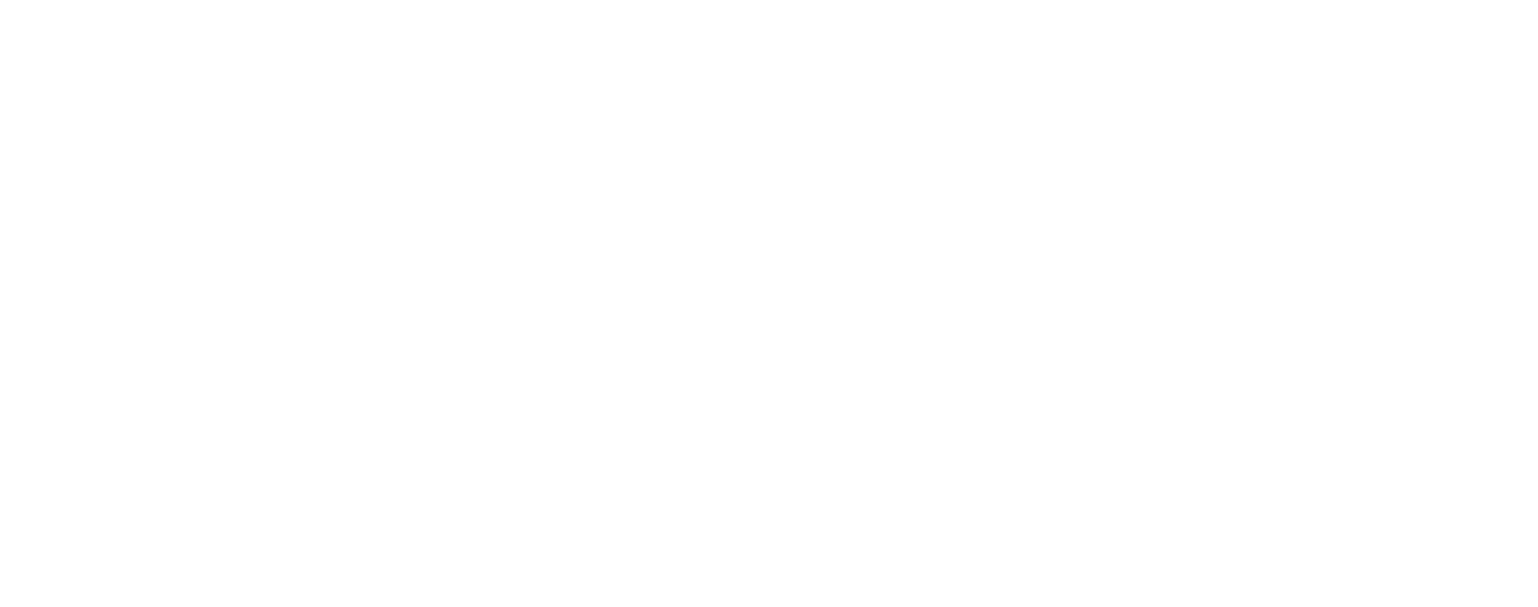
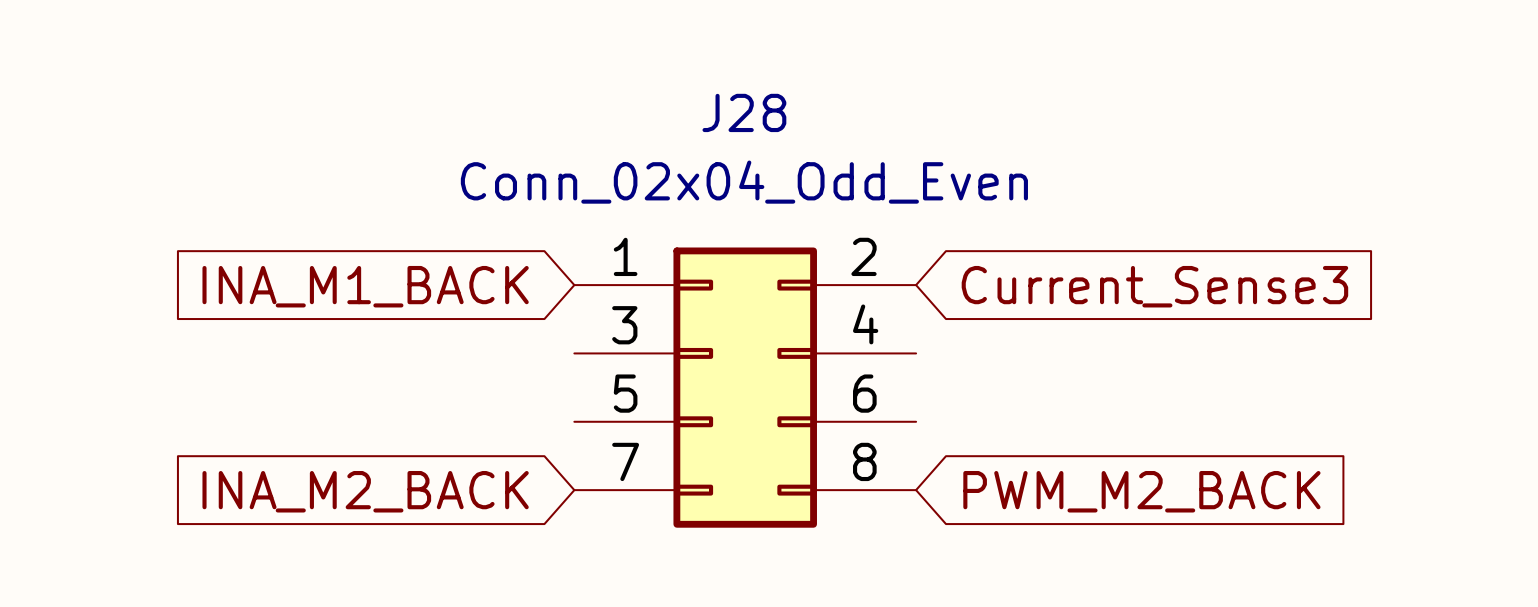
global label: none -> INA_M1_BACK (365, 286)
global label: none -> Current_Sense3 (1154, 286)
J28: none -> Conn_02x04_Odd_Even (745, 387)
global label: none -> INA_M2_BACK (365, 491)
global label: none -> PWM_M2_BACK (1141, 491)

